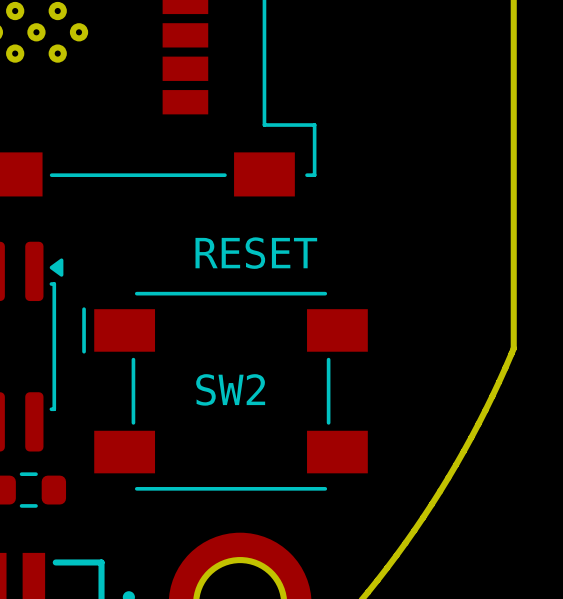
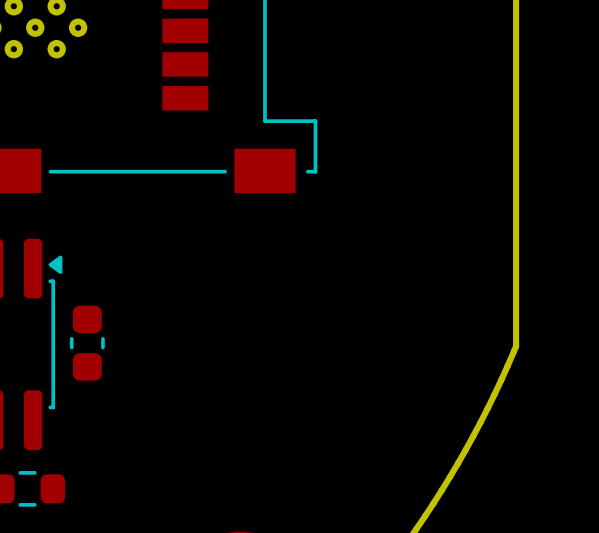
text: RESET (256, 253) -> none
part: none -> (87, 343)
SW2: (225, 391) -> none

